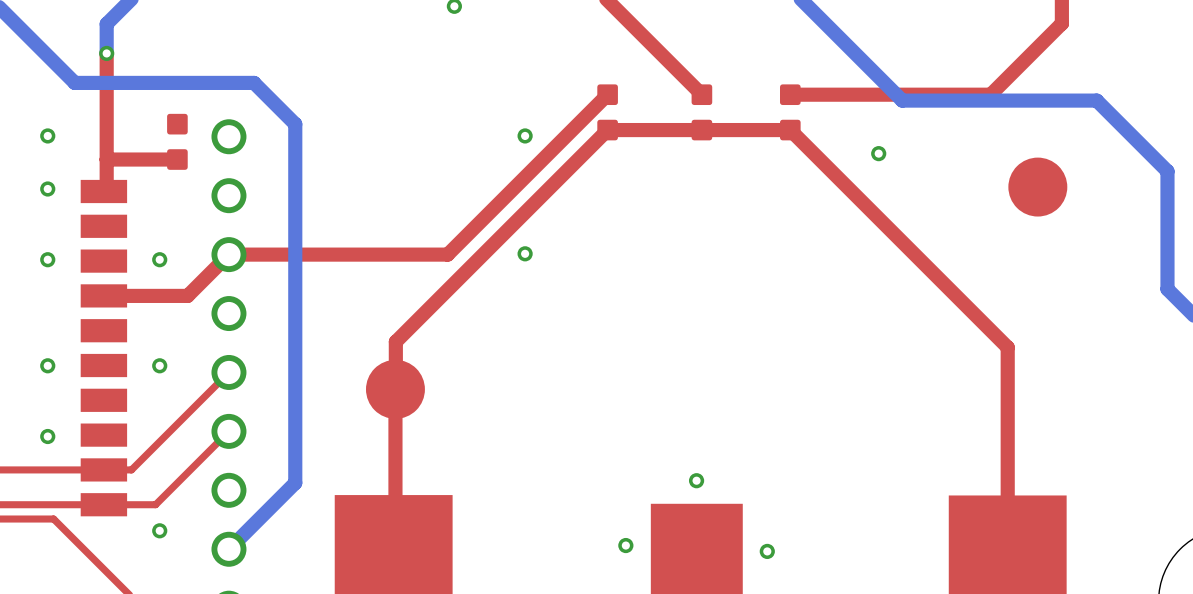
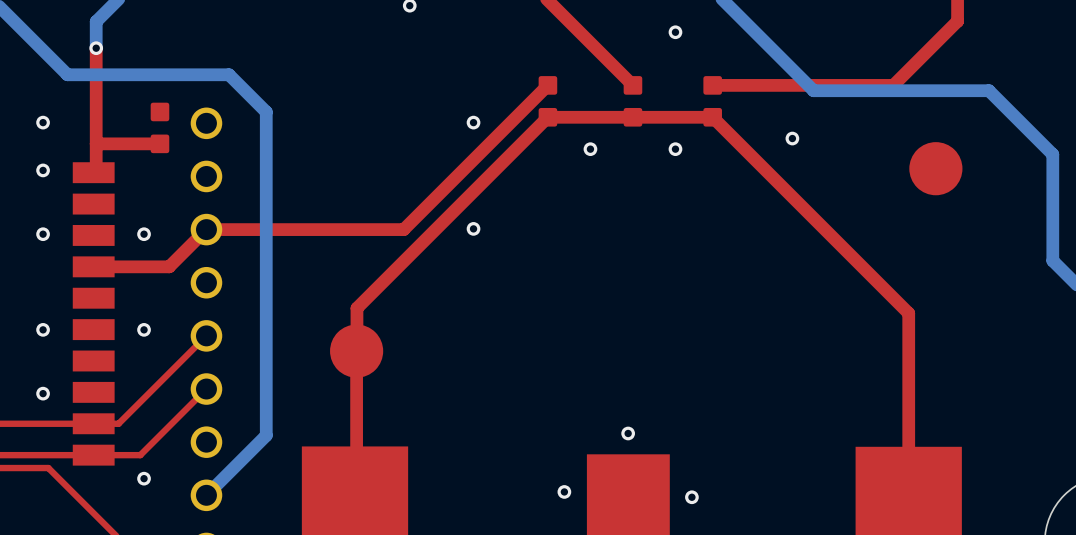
via: none -> (675, 32)
via: none -> (590, 149)
via: none -> (675, 149)

